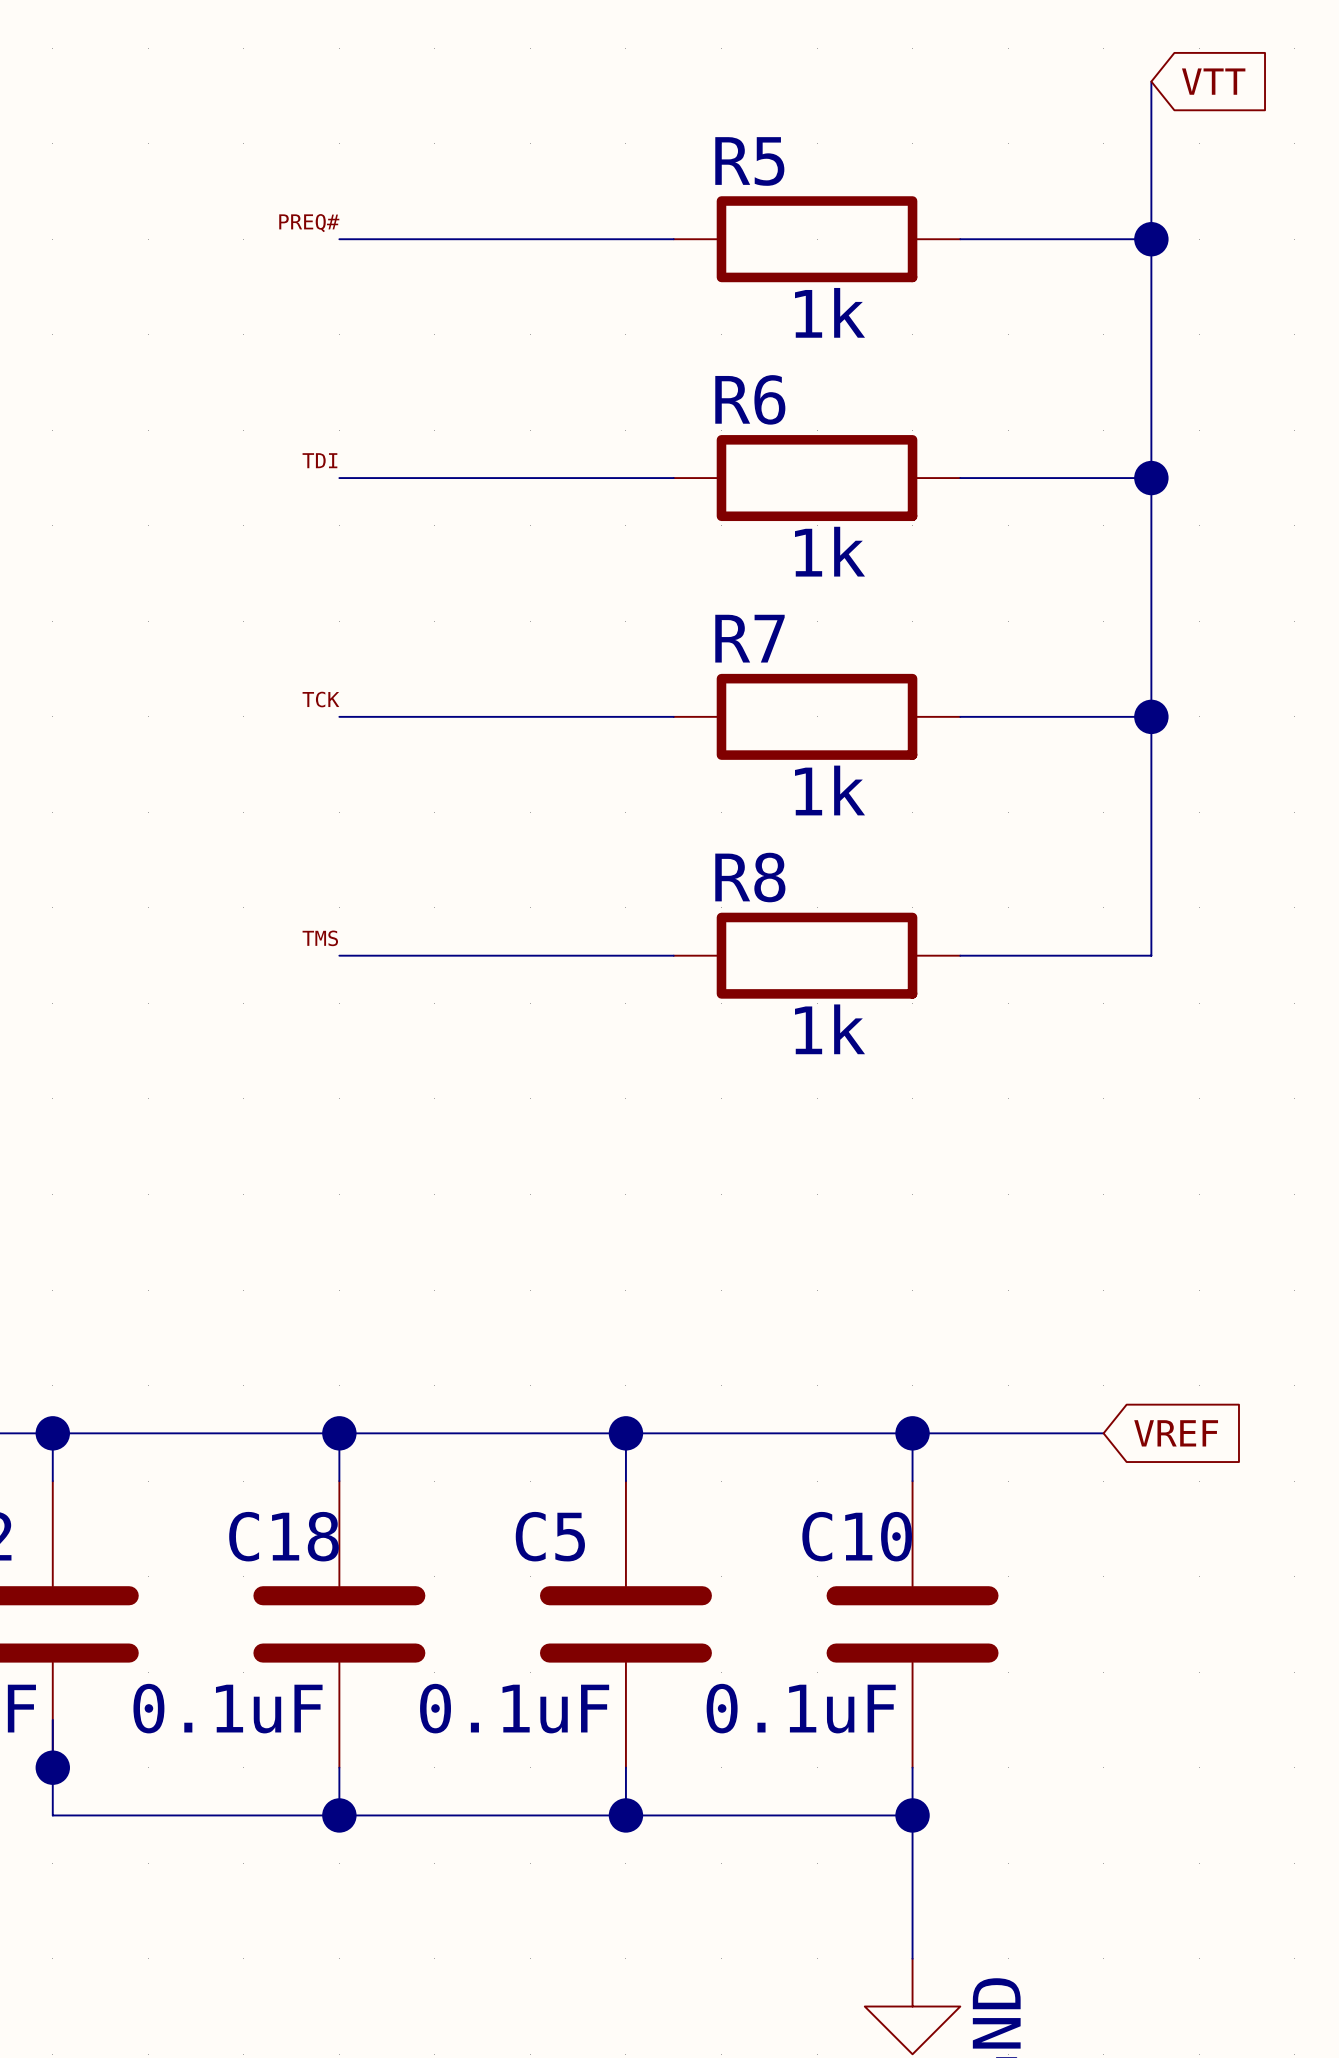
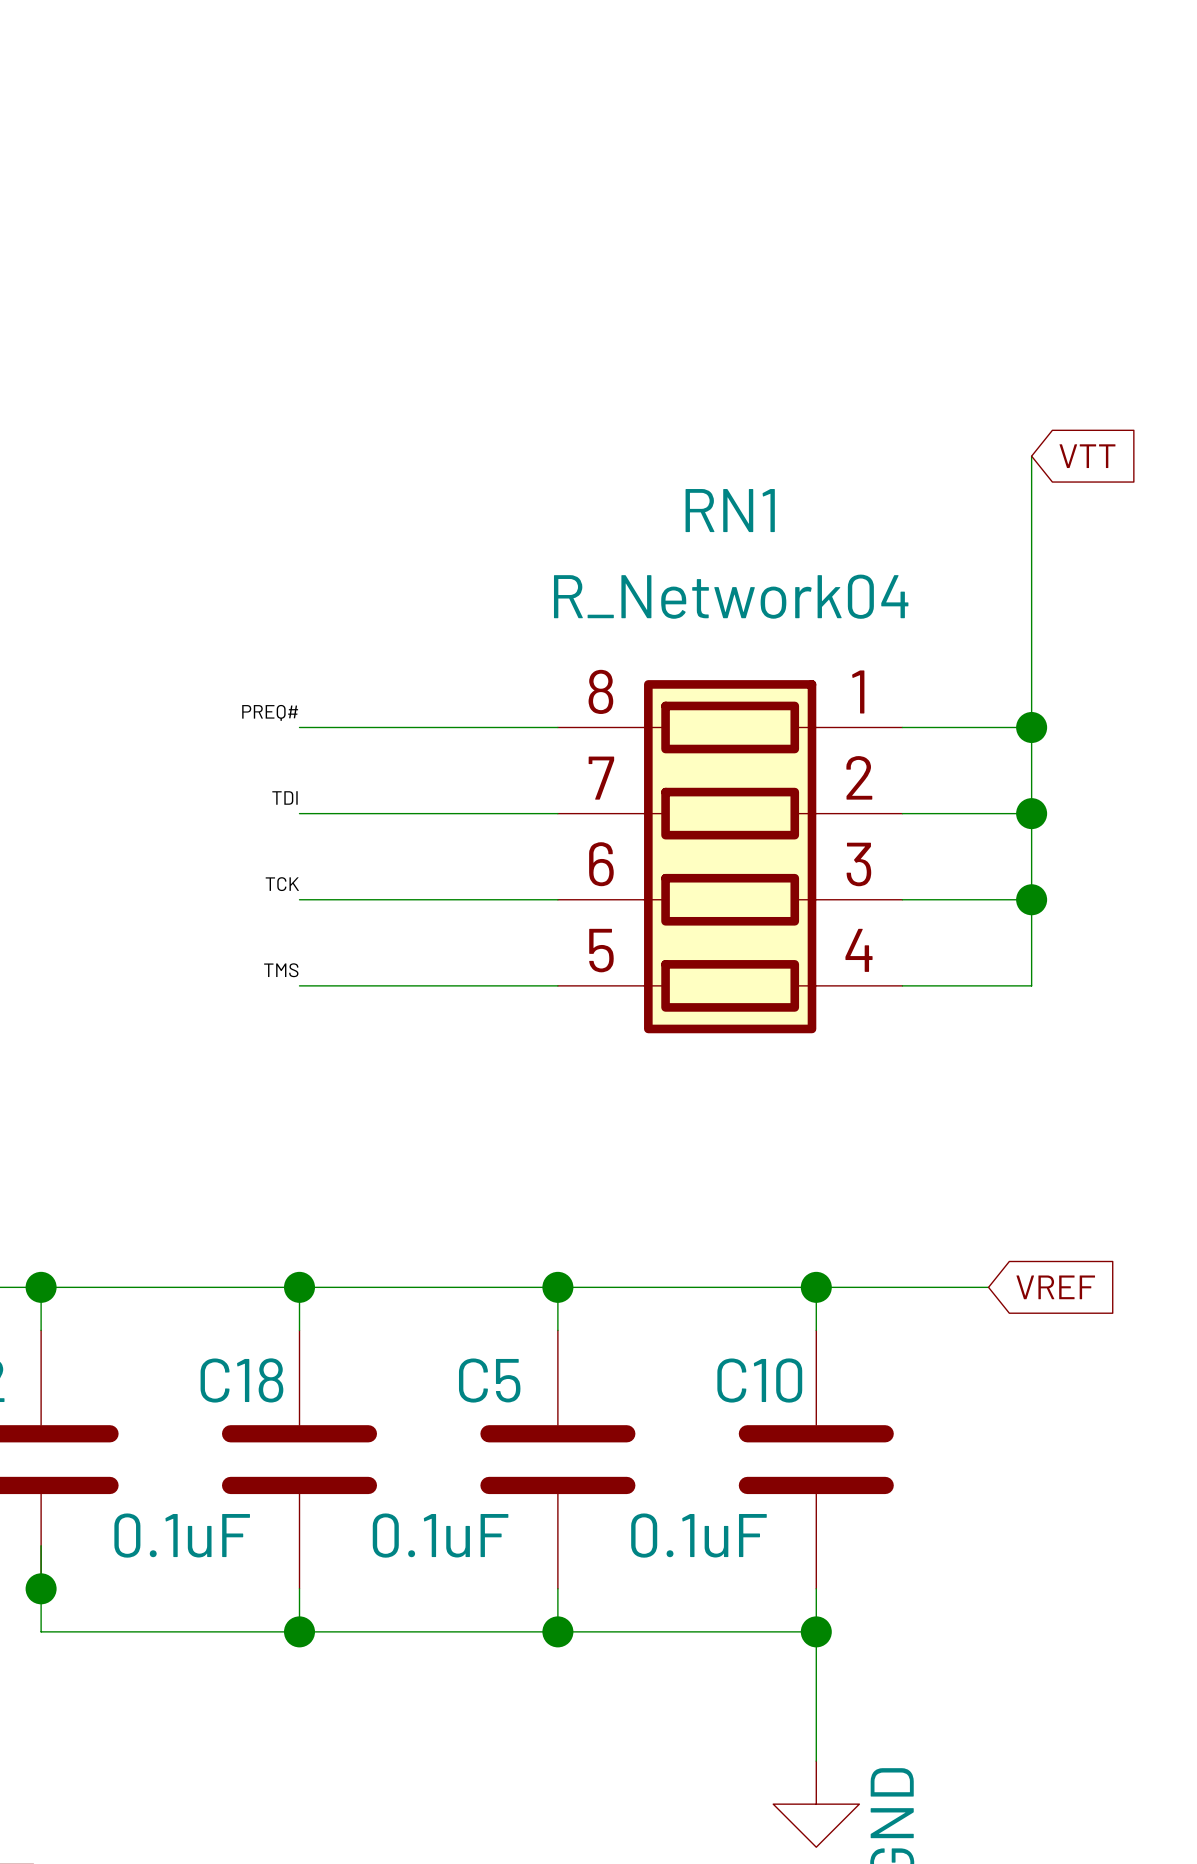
wire: (1151, 81) (1151, 511) -> none
global label position: VTT (1213, 81) -> VTT (1087, 456)
label position: PREQ# (309, 223) -> PREQ# (270, 712)
wire: (339, 239) (673, 239) -> none
R5: 1k (817, 239) -> none
wire: (960, 239) (1151, 239) -> none
junction: (1151, 239) -> none
label position: TDI (319, 460) -> TDI (284, 797)
wire: (339, 478) (673, 478) -> none
R6: 1k (817, 478) -> none
wire: (960, 478) (1151, 478) -> none
junction: (1151, 478) -> none
label position: TCK (320, 699) -> TCK (282, 884)
wire: (339, 716) (673, 716) -> none
R7: 1k (817, 716) -> none
wire: (960, 716) (1151, 716) -> none
junction: (1151, 716) -> none
wire: none -> (299, 727) (557, 727)
wire: none -> (902, 727) (1031, 727)
junction: none -> (1031, 727)
wire: none -> (299, 813) (557, 813)
wire: none -> (902, 813) (1031, 813)
junction: none -> (1031, 813)
label position: TMS (320, 938) -> TMS (281, 970)
wire: (339, 955) (673, 955) -> none
R8: 1k (817, 955) -> none
RN1: none -> R_Network04 (730, 856)
wire: (960, 955) (1151, 955) -> (902, 985) (1031, 985) (1031, 856)
wire: none -> (299, 899) (557, 899)
wire: none -> (902, 899) (1031, 899)
junction: none -> (1031, 899)
wire: none -> (299, 985) (557, 985)

